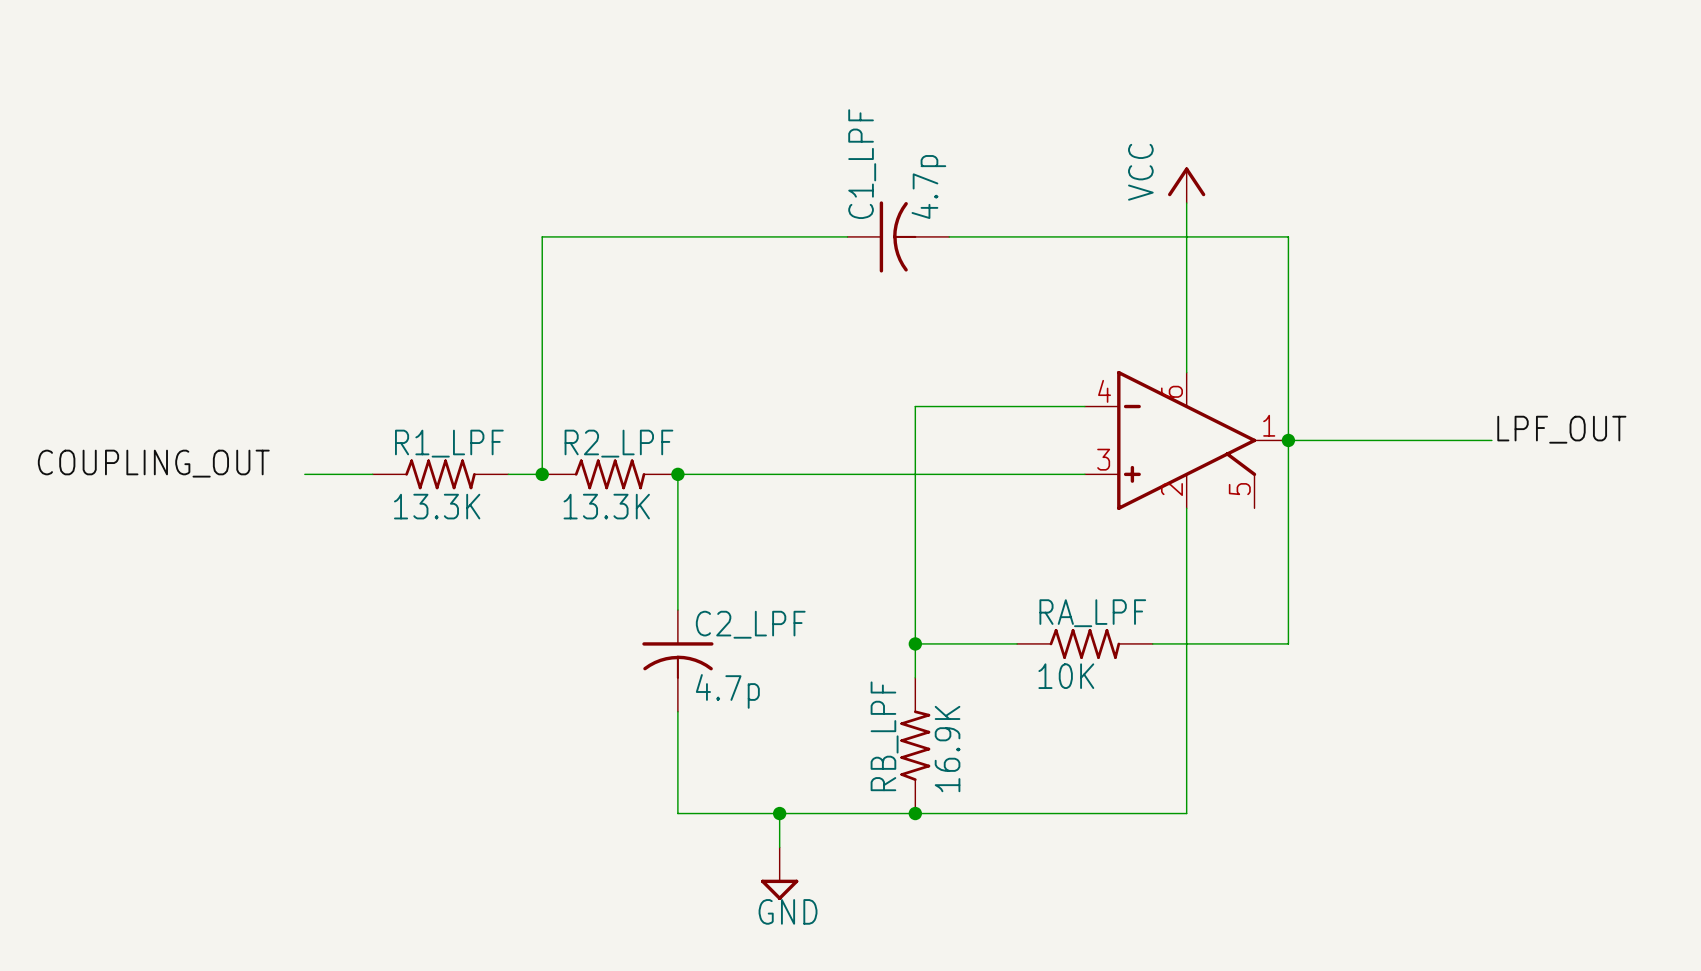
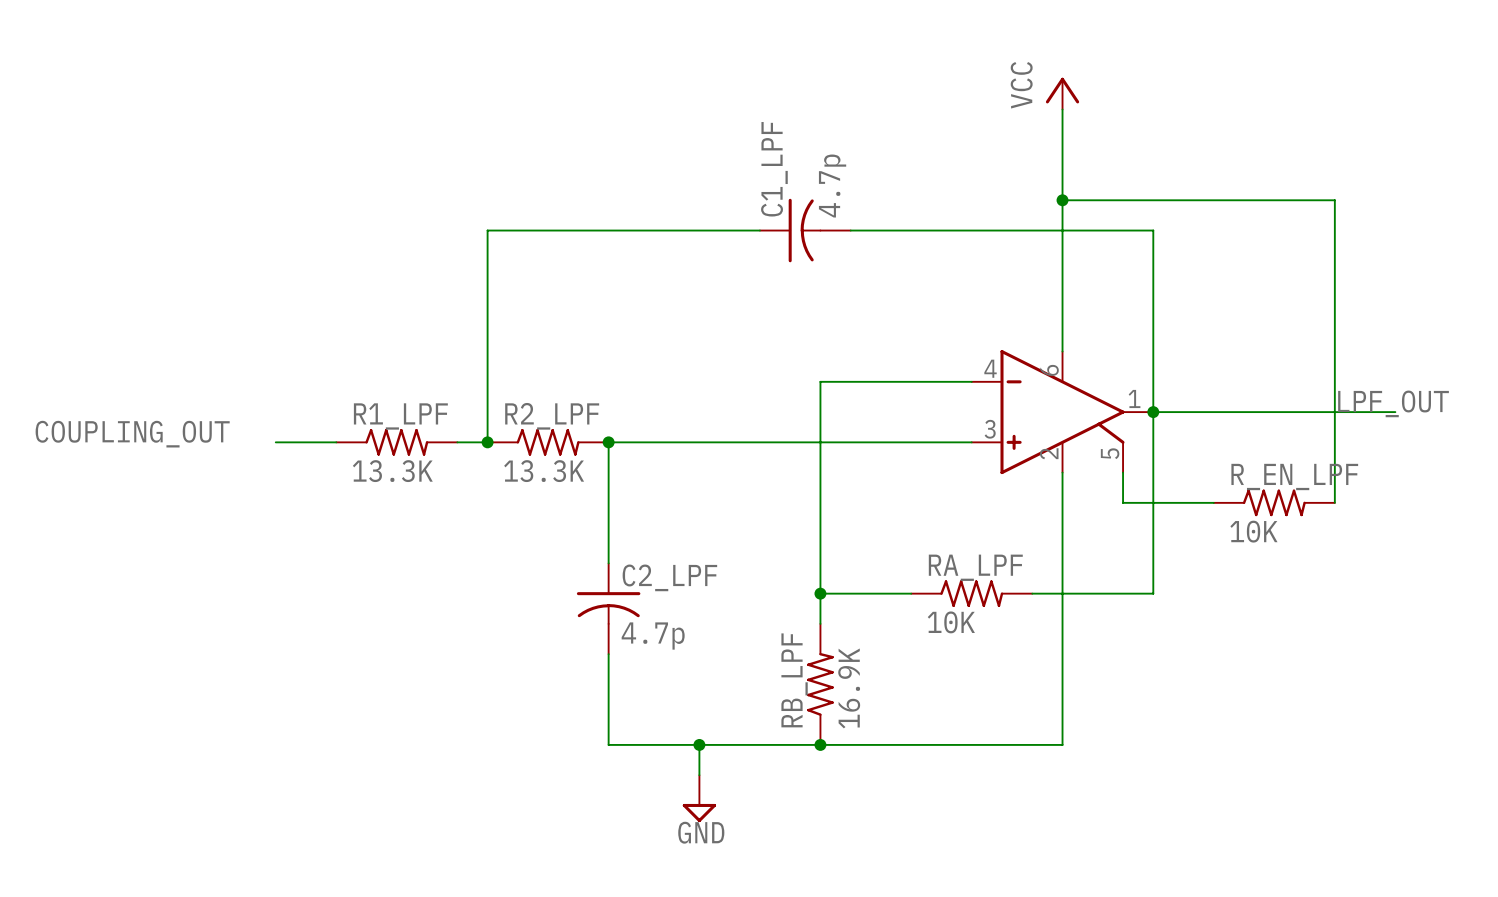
wire: none -> (1062, 109) (1062, 200) (1334, 200) (1334, 502)
power symbol position: VCC (1186, 185) -> VCC (1062, 93)
junction: none -> (1062, 200)
wire: none -> (1334, 412) (1395, 412)
wire: none -> (1123, 472) (1123, 502) (1213, 502)
R_EN_LPF: none -> 10K (1274, 502)

